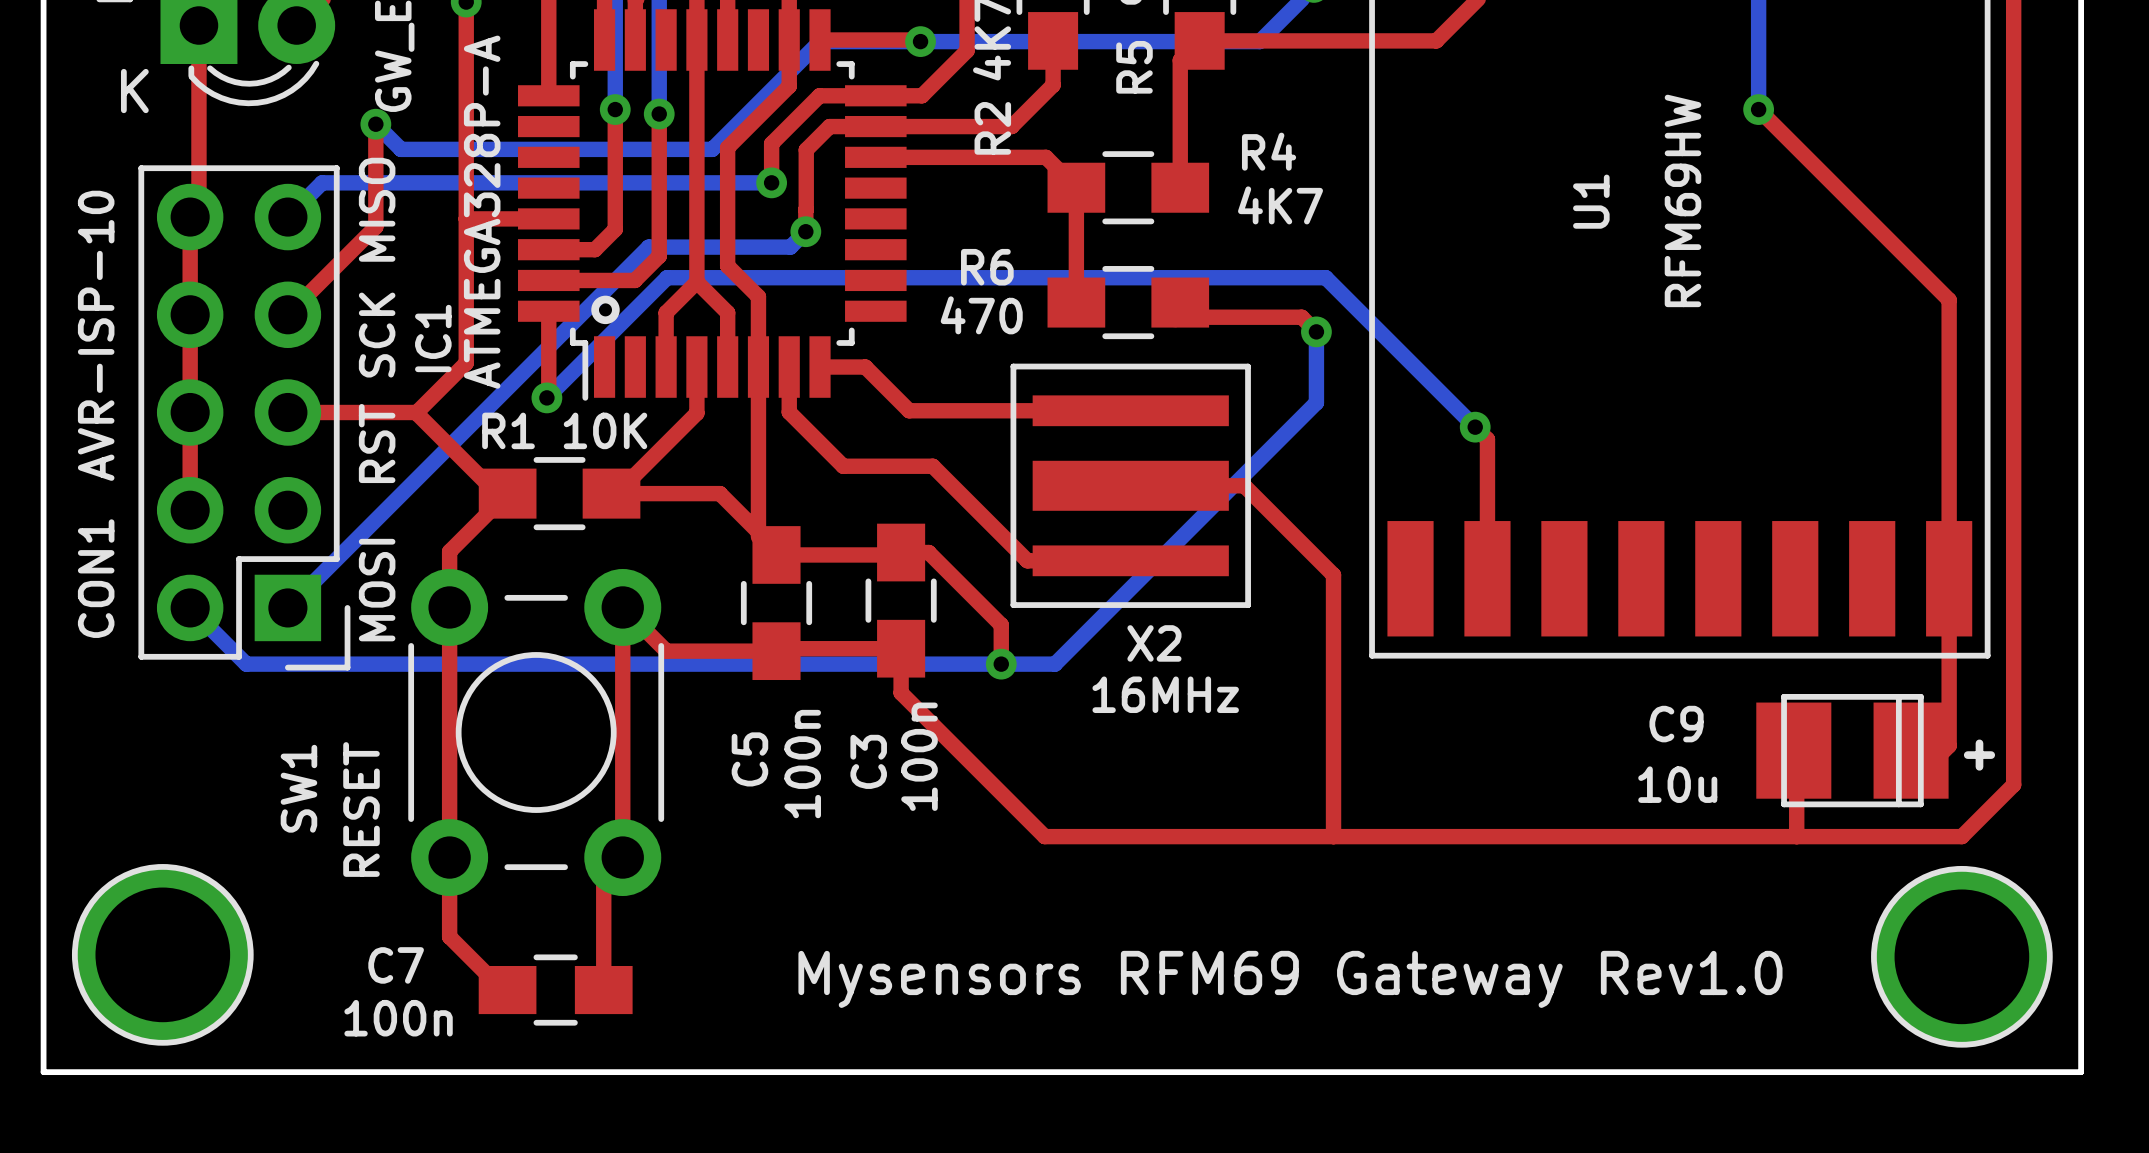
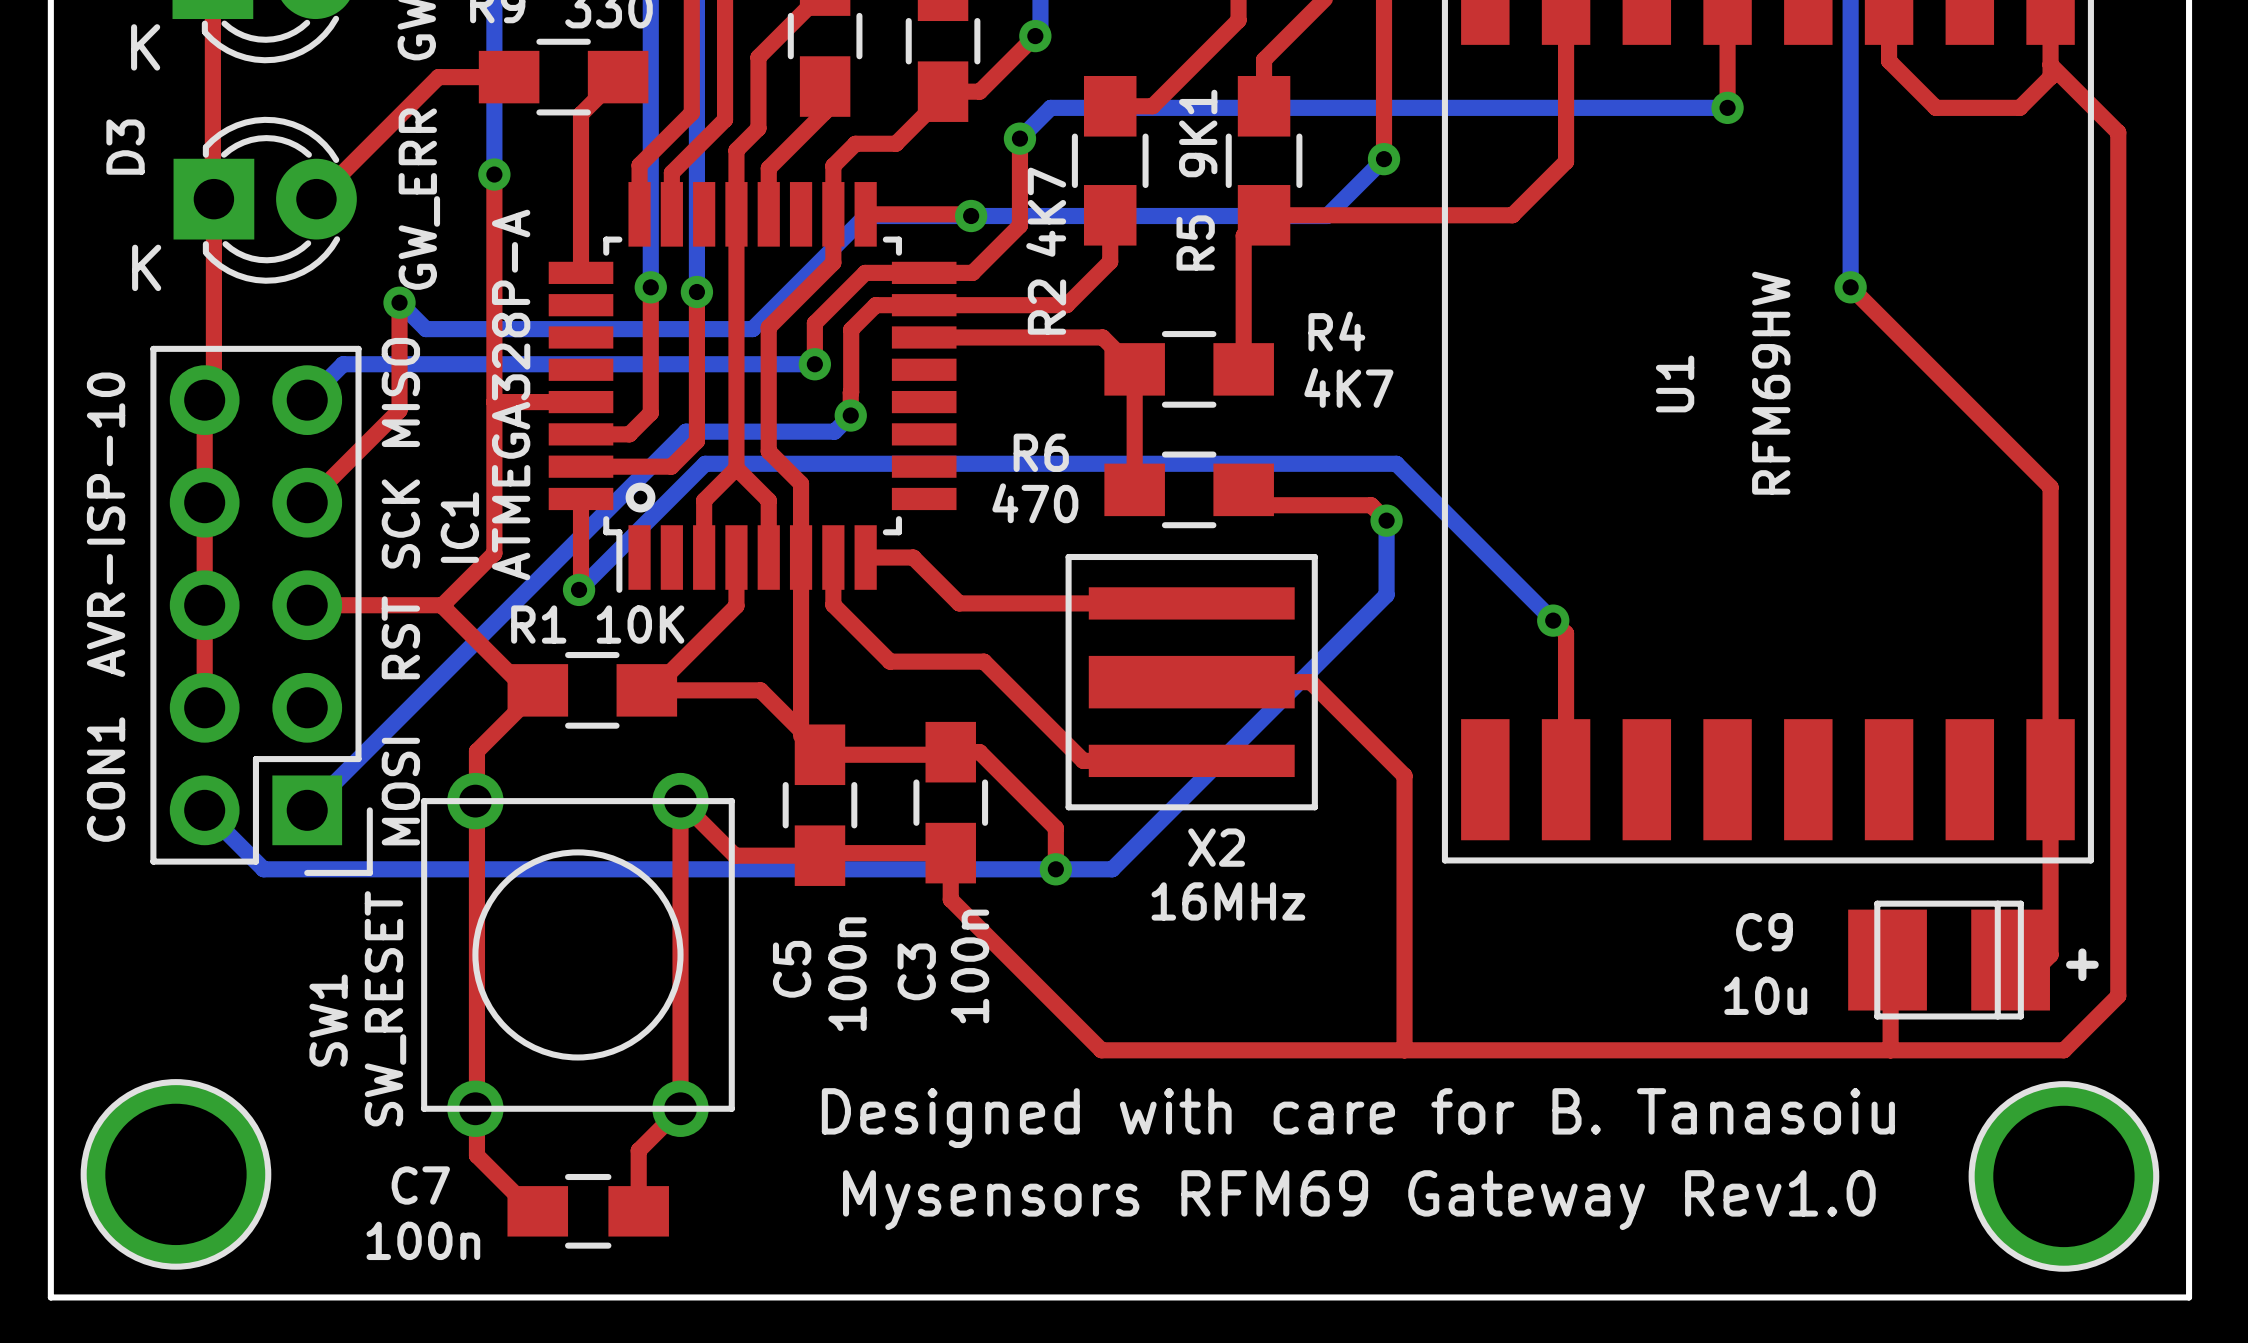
SW1 footprint: [408, 568, 665, 897] -> [421, 772, 735, 1137]
top track: (695, 651) (666, 651) (622, 607) (622, 857) (603, 876) (603, 932) -> (735, 855) (680, 801) (680, 1108) (638, 1150)
SW1 value: RESET (361, 809) -> SW_RESET (385, 1008)
text: none -> Designed with care for B. Tanasoiu (1358, 1118)

